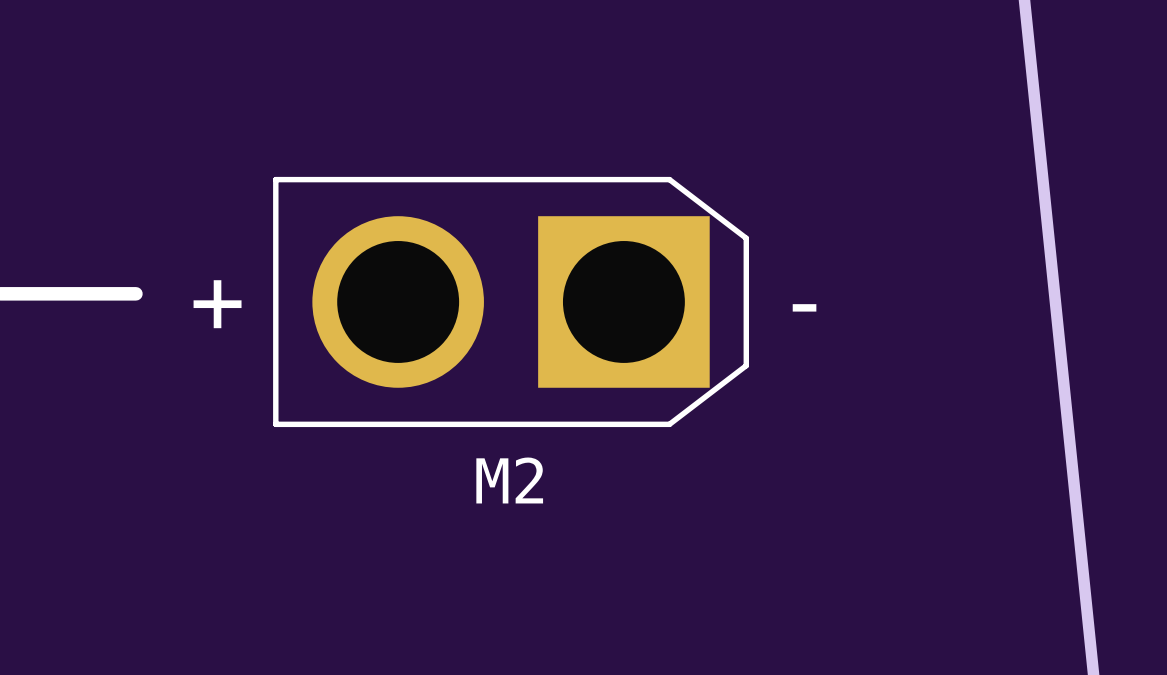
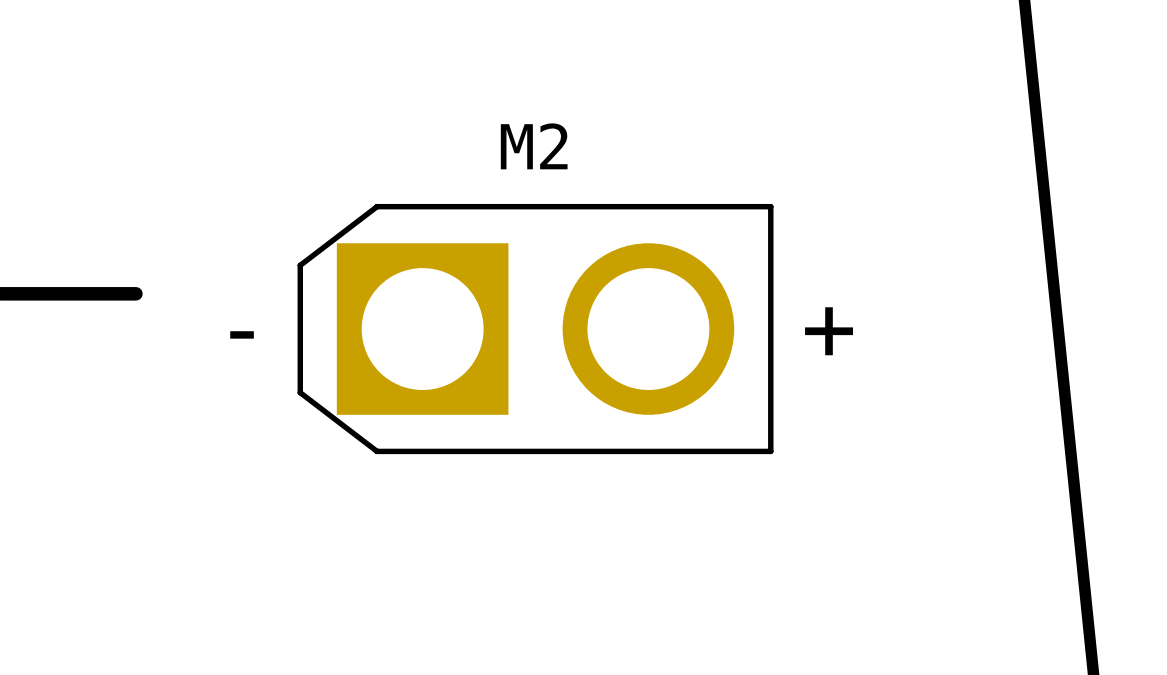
M2 rotation: 0° (511, 301) -> 180° (535, 329)

